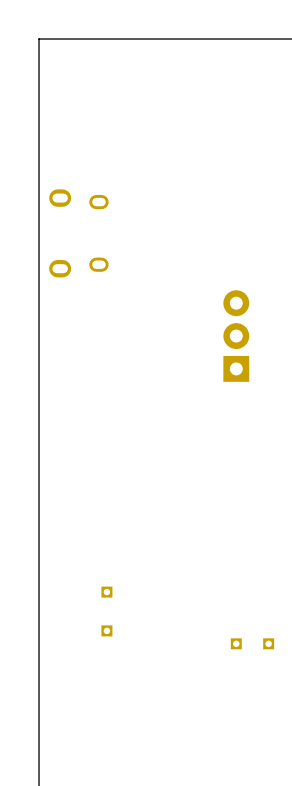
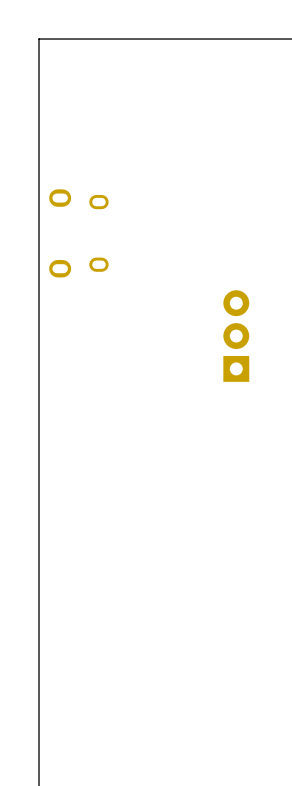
part: (106, 592) -> none
part: (106, 630) -> none
part: (236, 643) -> none
part: (268, 643) -> none

